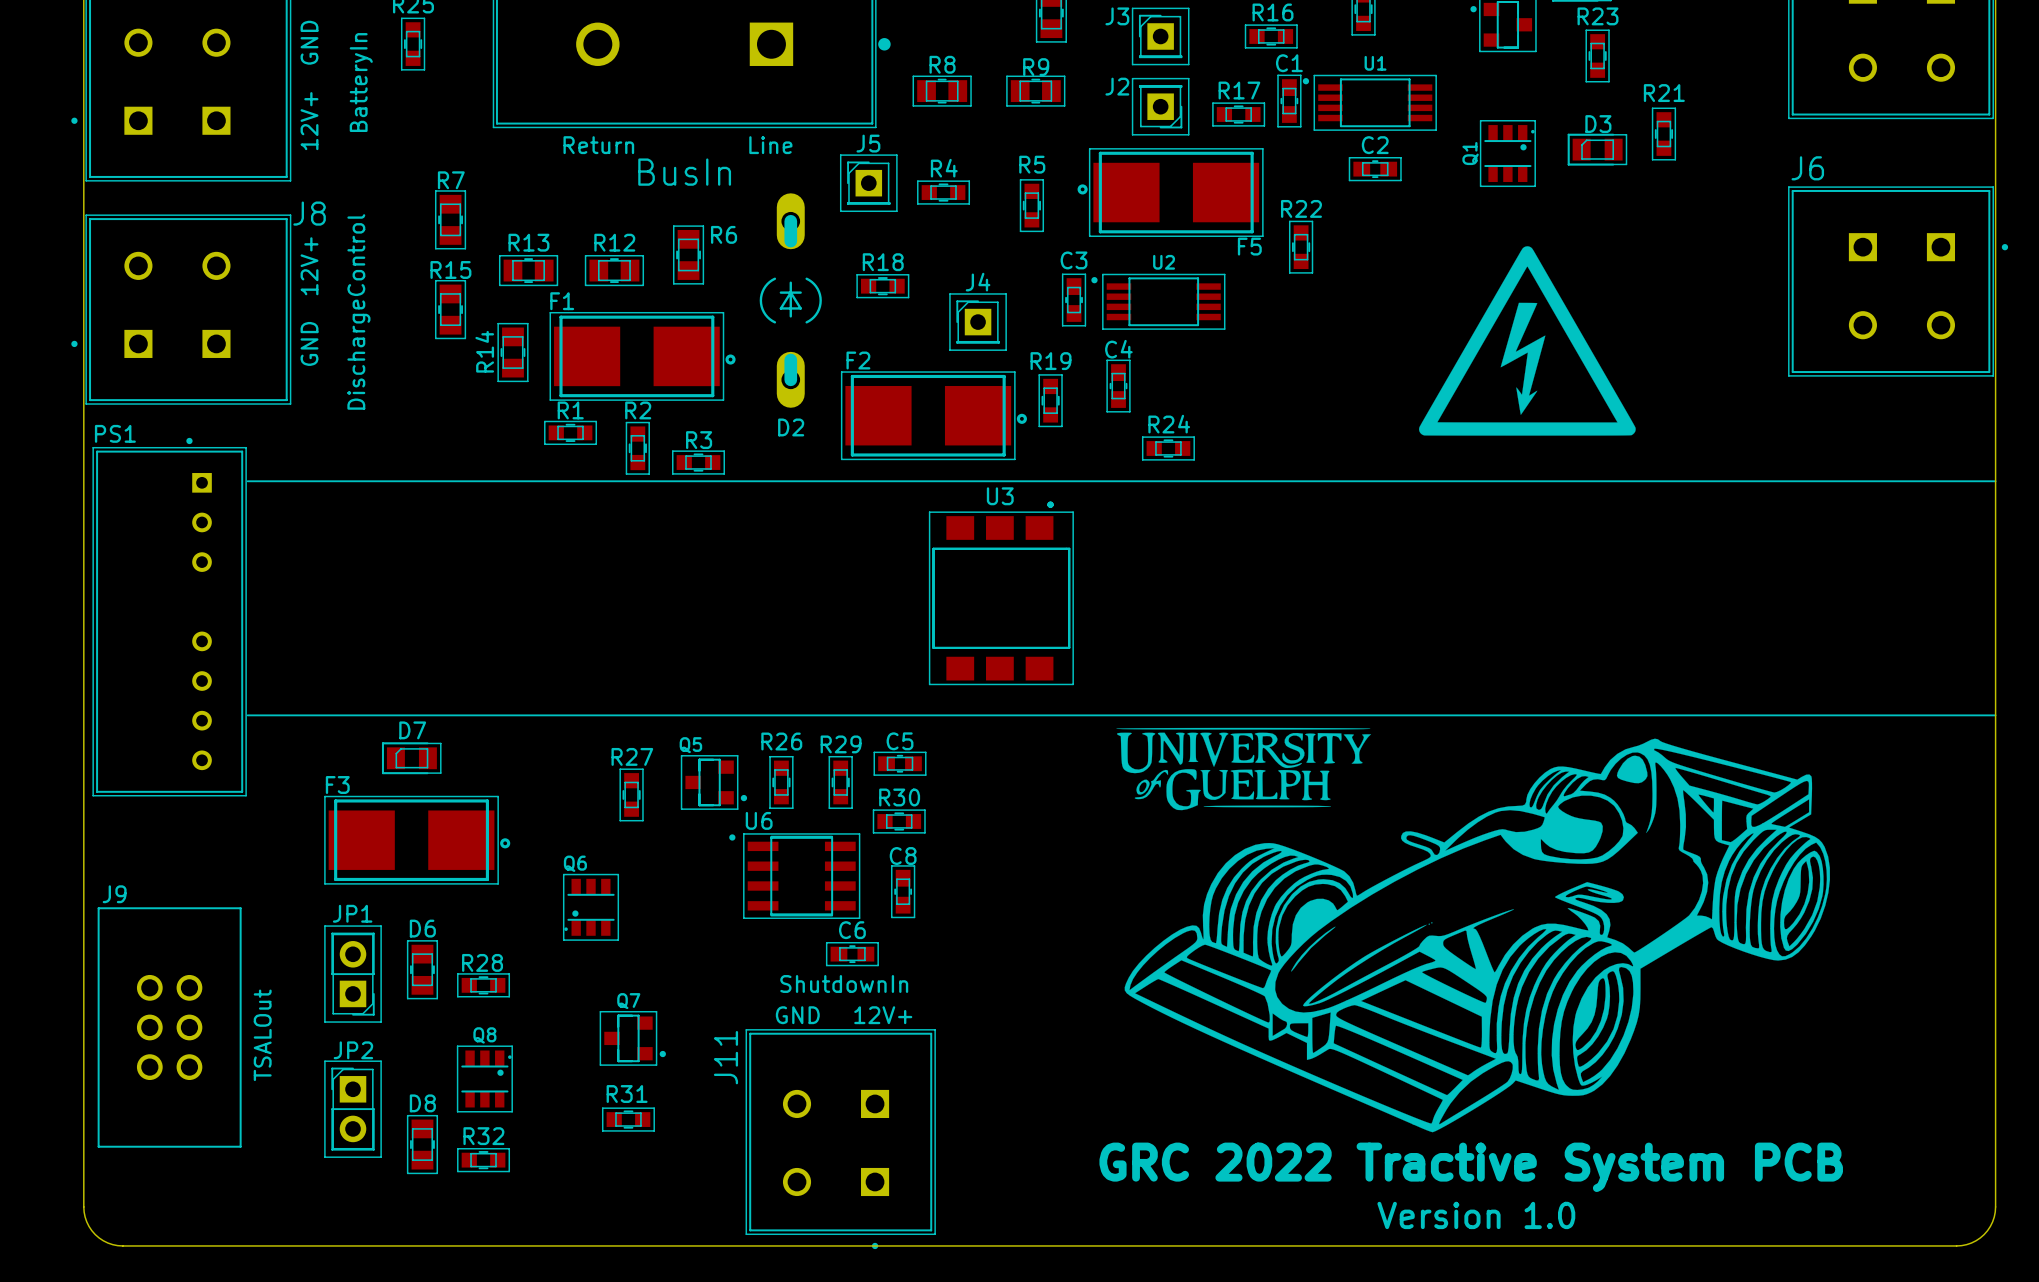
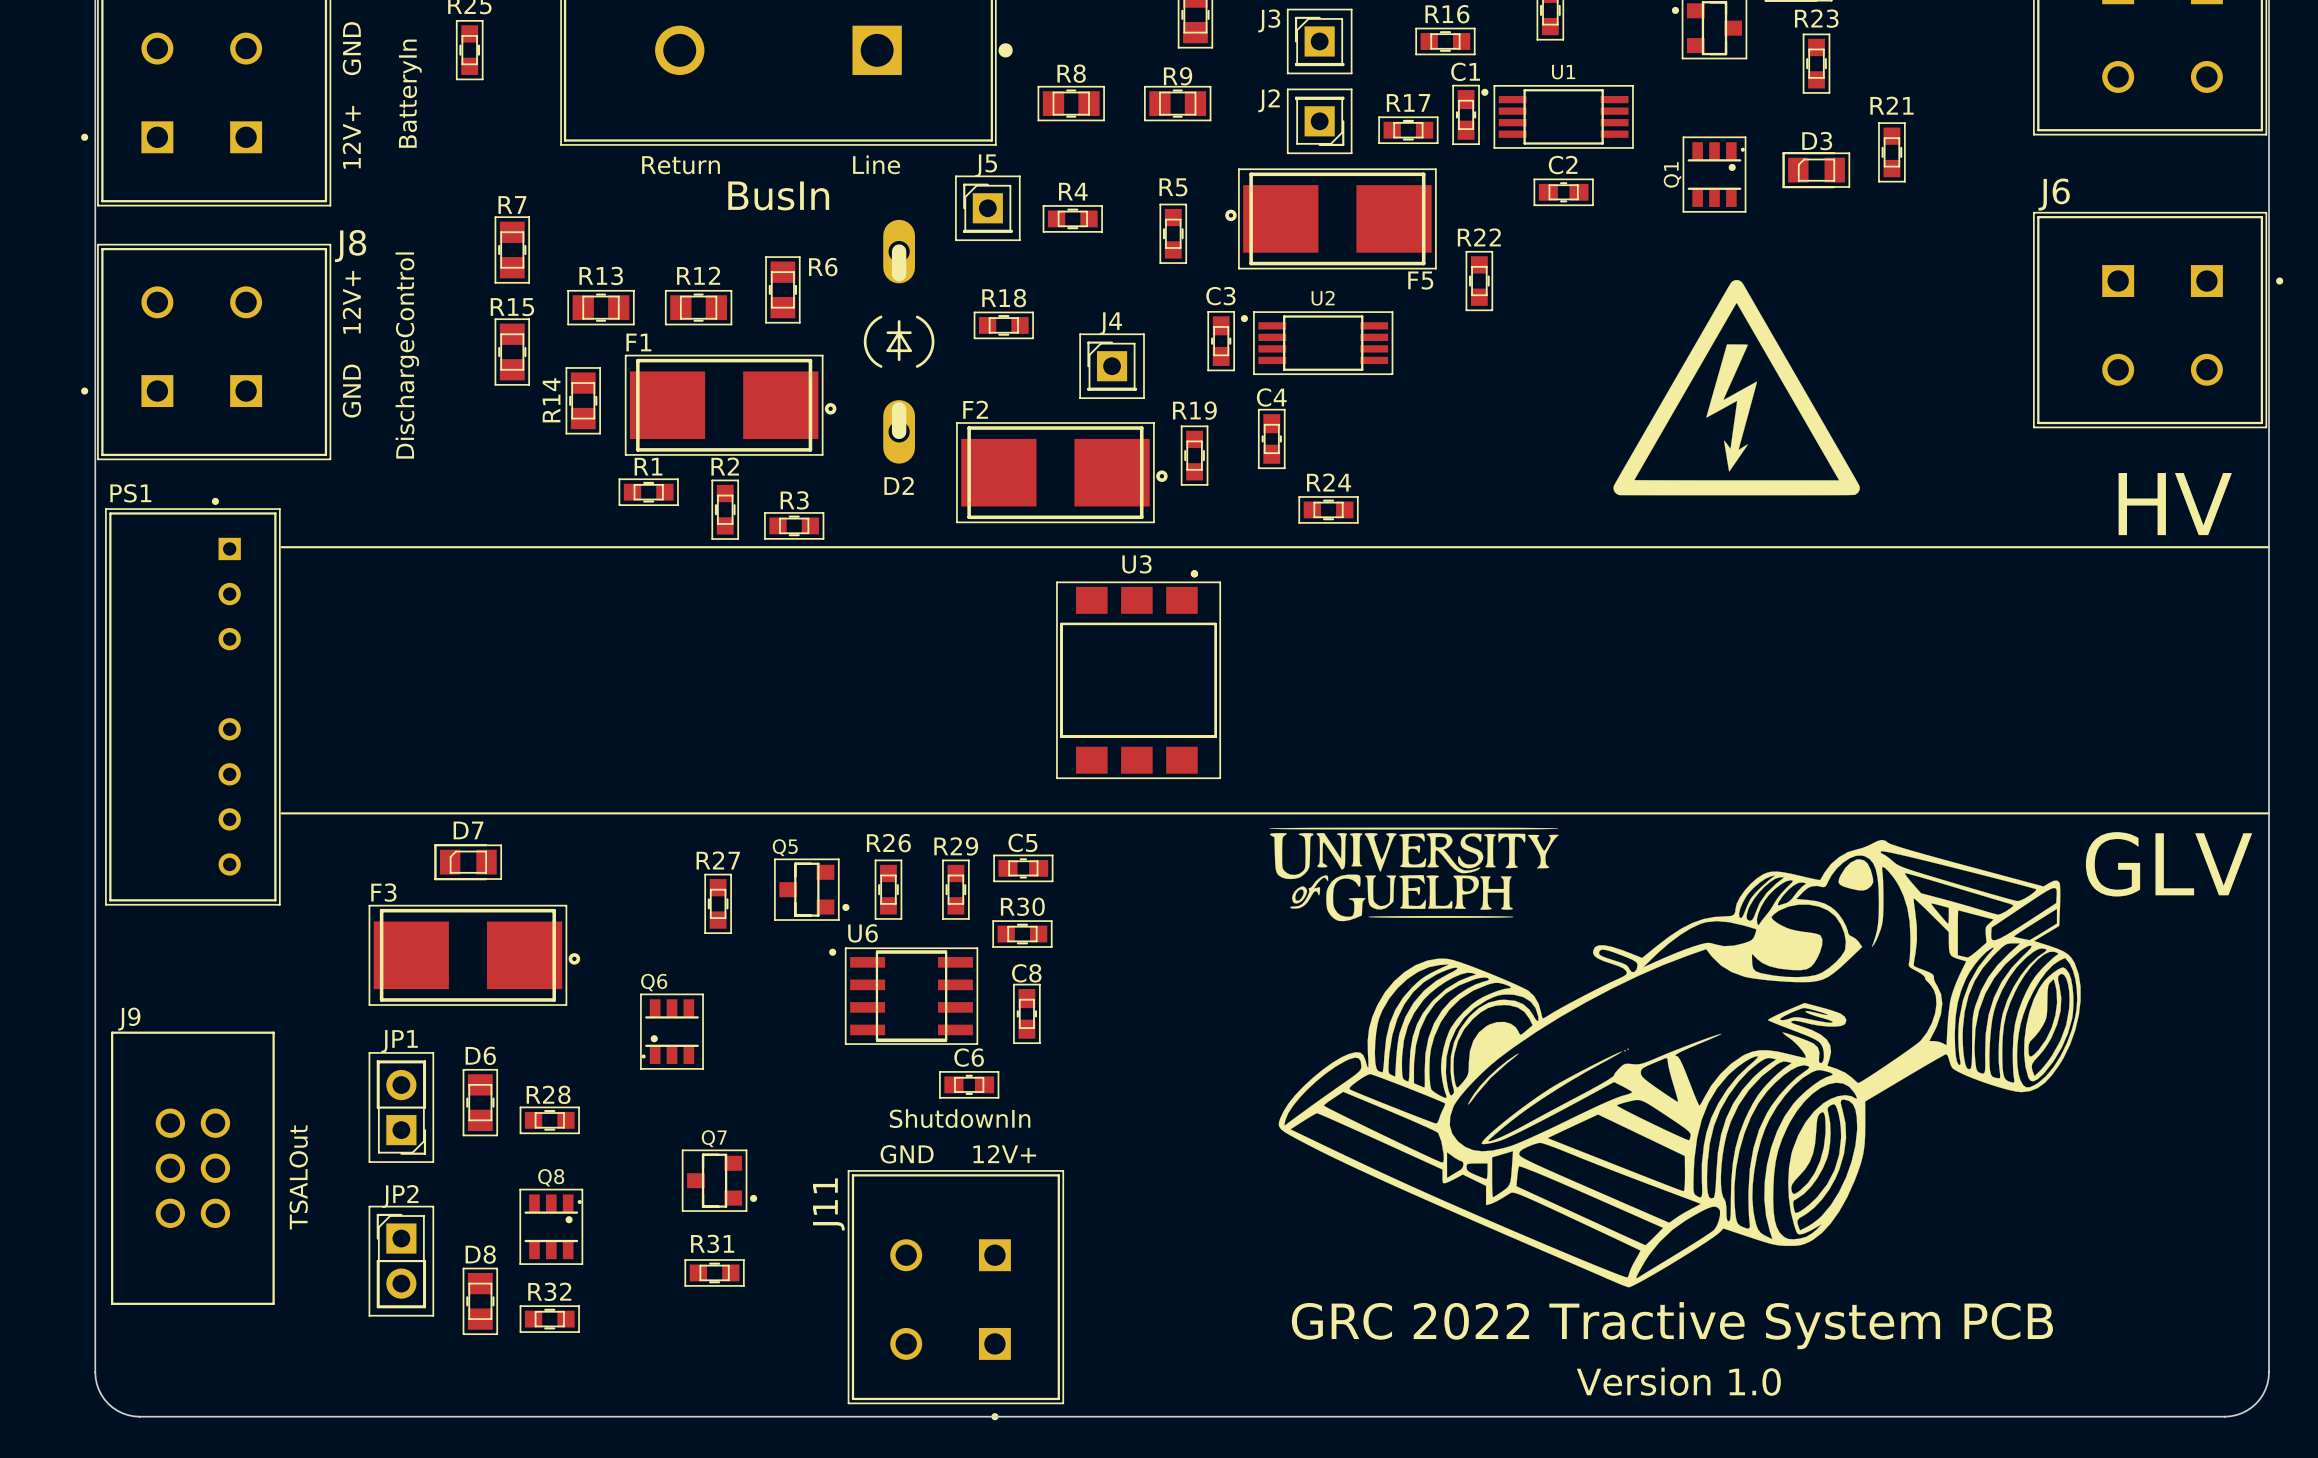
text: none -> HV (2175, 504)
text: none -> GLV (2169, 864)

